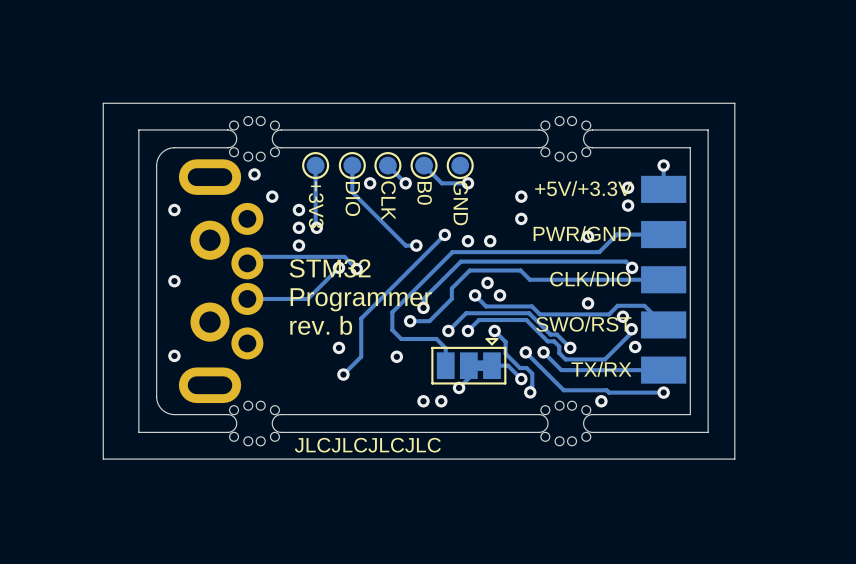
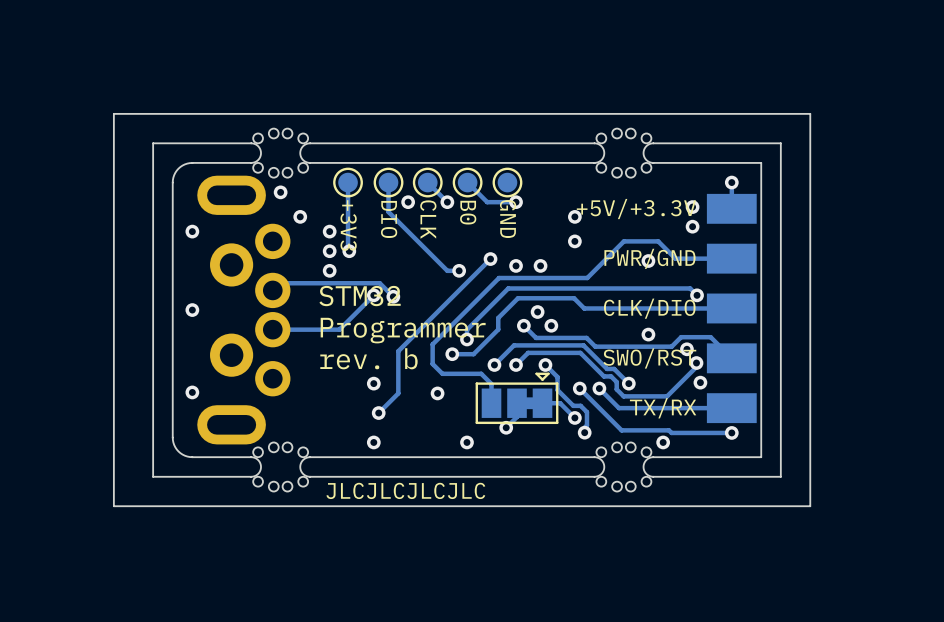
track: (616, 234) (599, 252) (532, 252) -> (680, 258) (675, 258) (658, 241) (623, 241) (587, 278)
via position: (441, 401) -> (373, 442)

